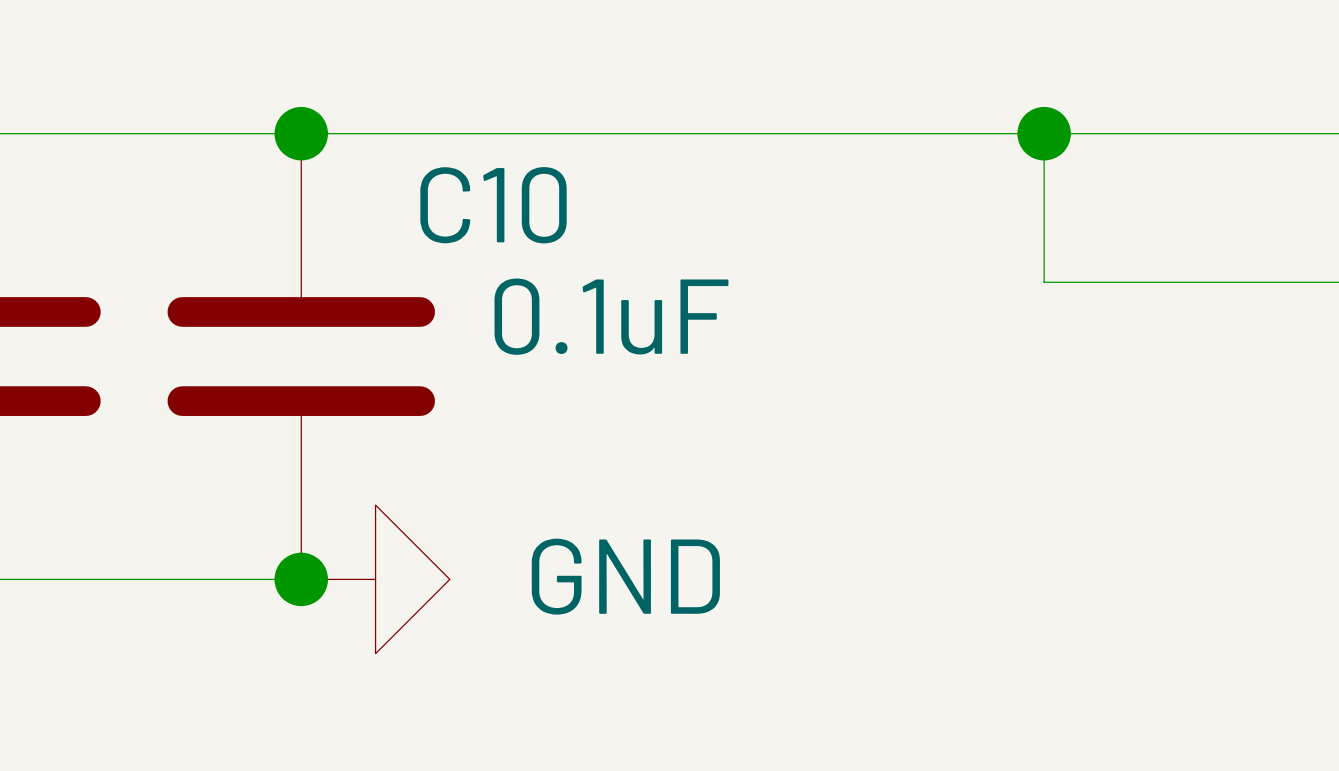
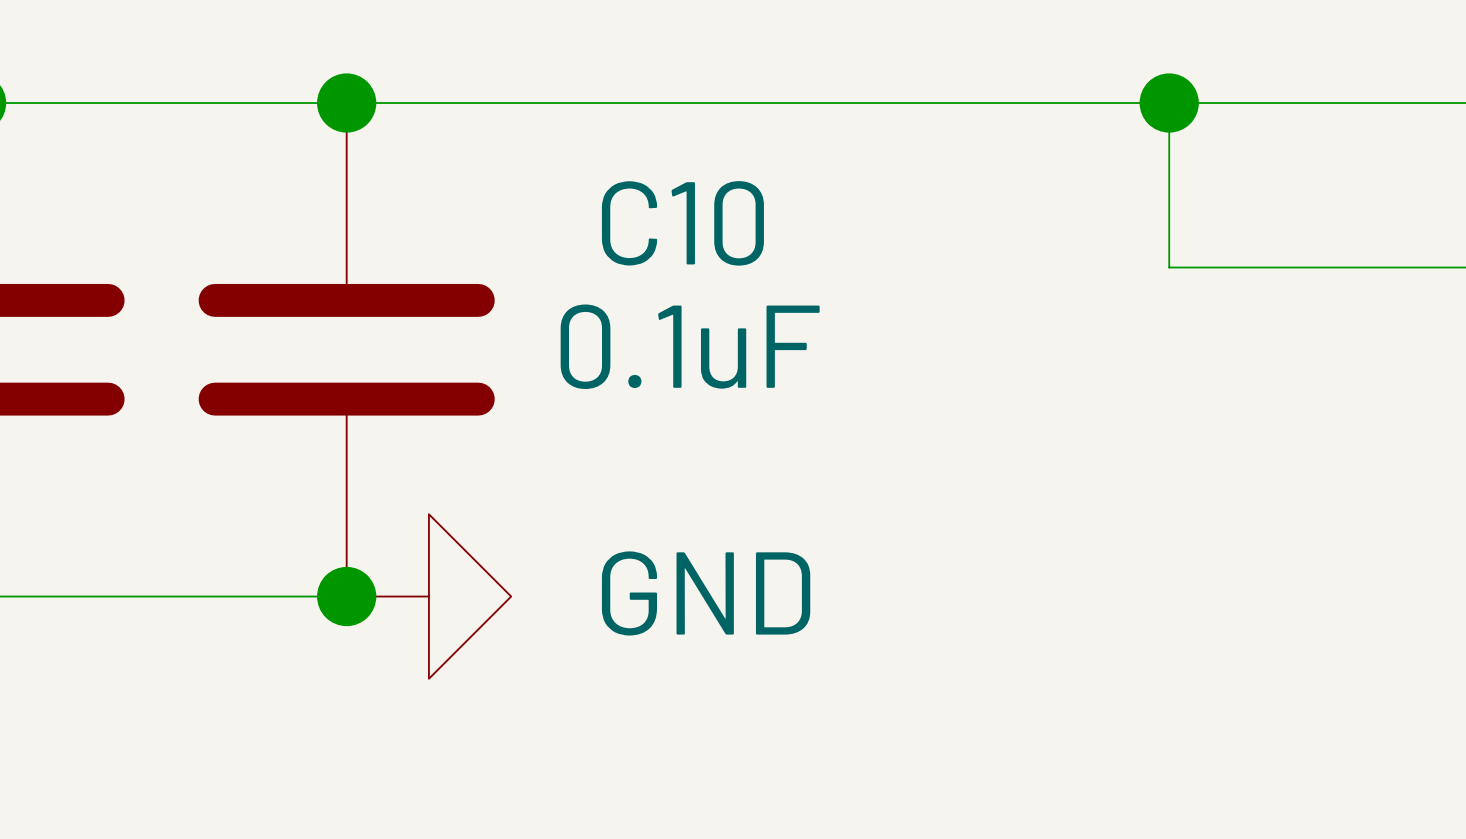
C10 name position: C10 (493, 205) -> C10 (682, 223)
C10 value position: 0.1uF (611, 316) -> 0.1uF (690, 346)

